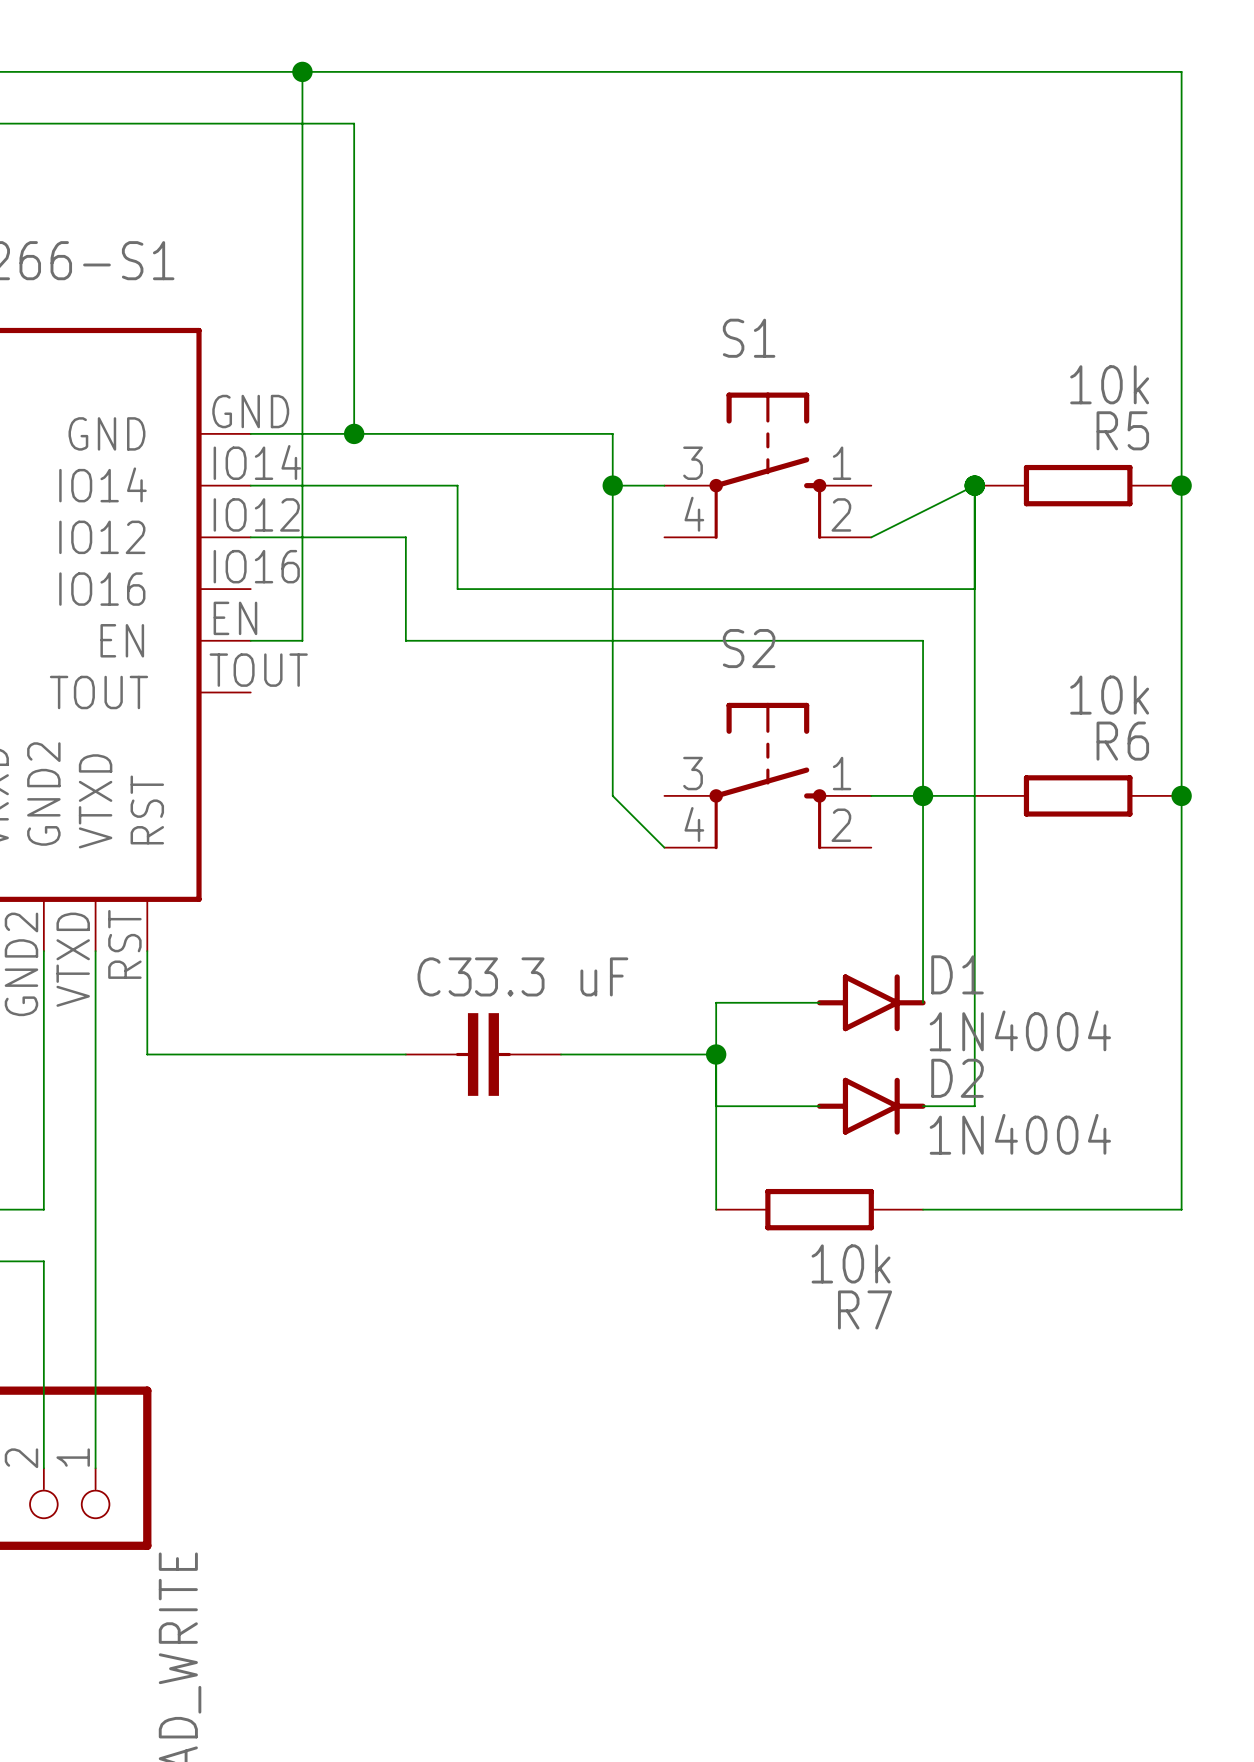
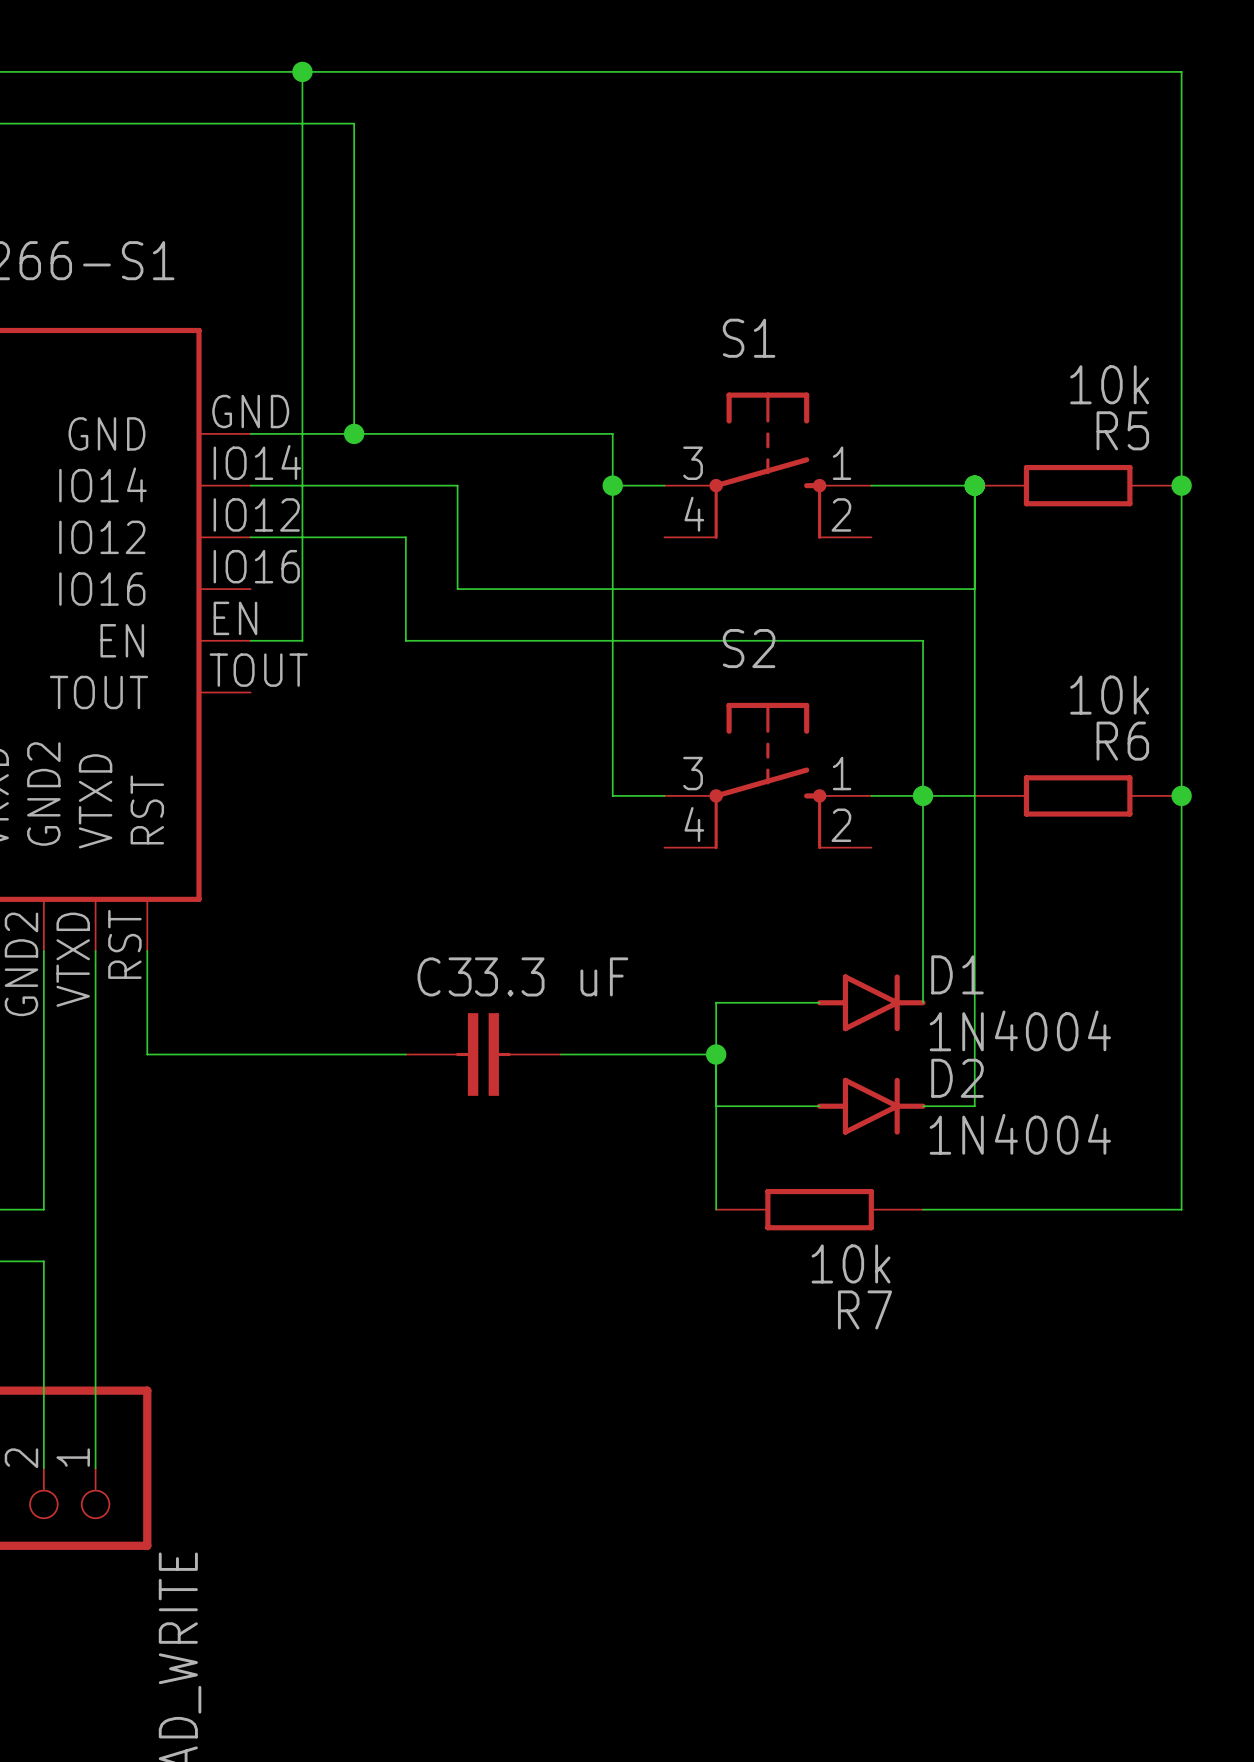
wire: (974, 485) (871, 537) -> (974, 485) (871, 485)
wire: (612, 795) (664, 847) -> (612, 795) (664, 795)

